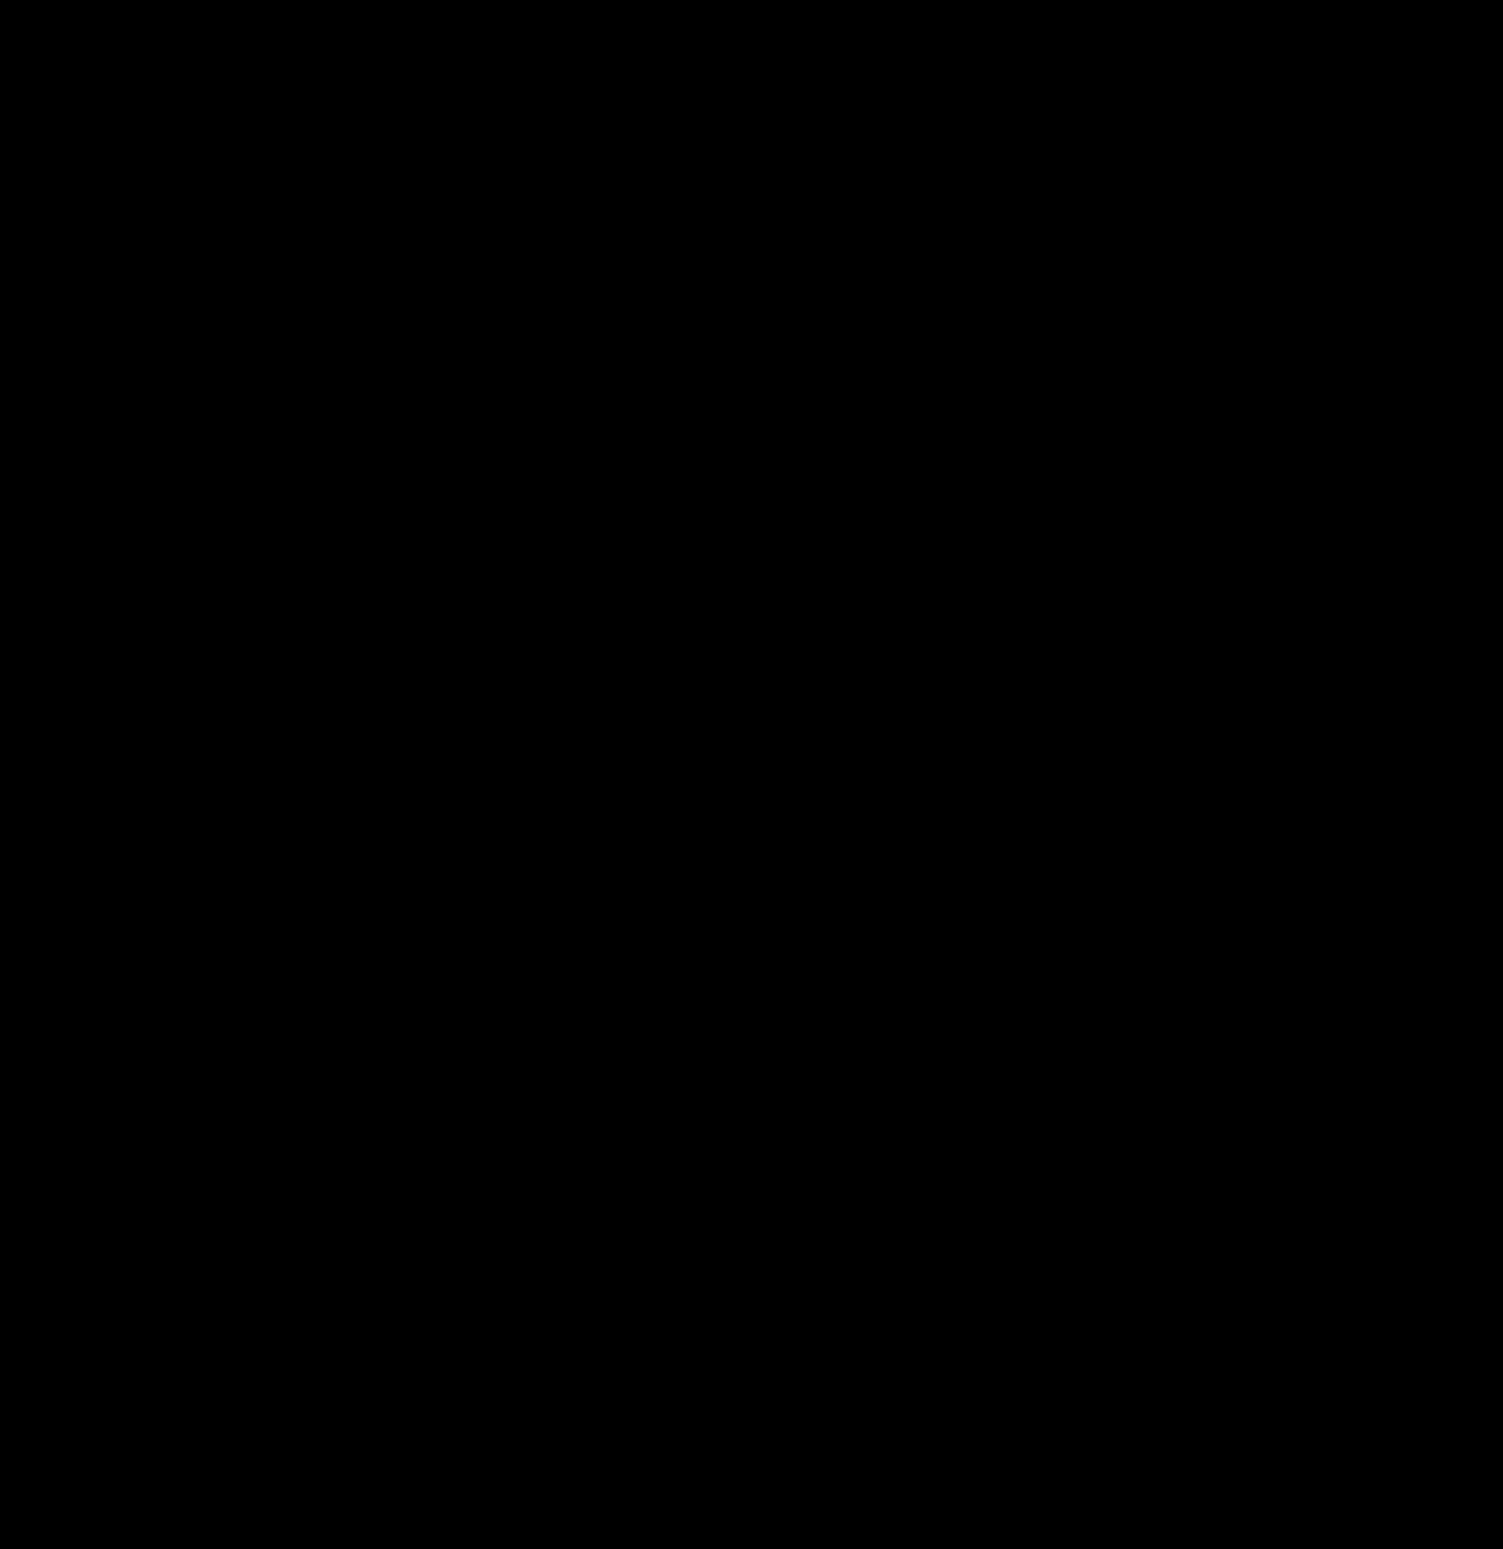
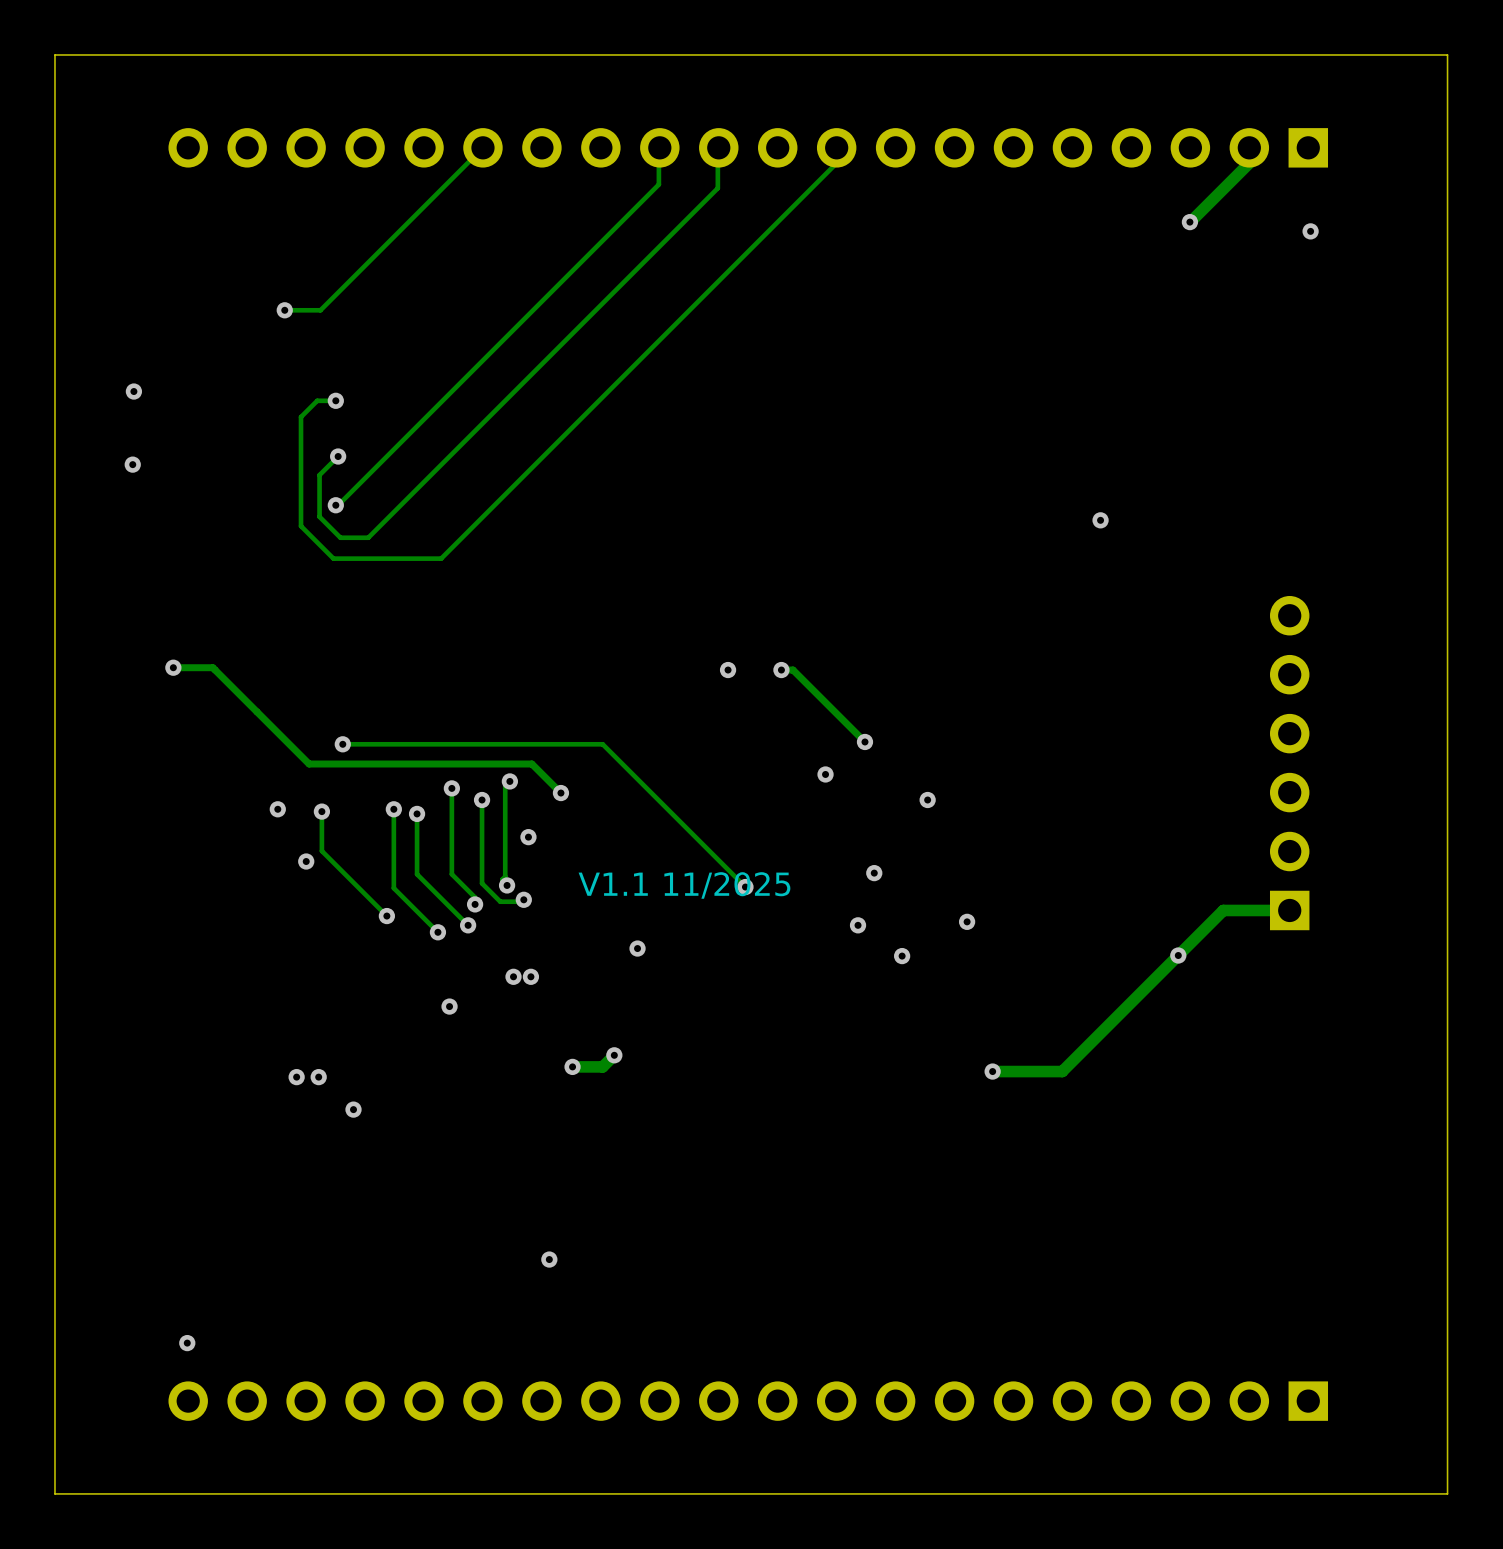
board edge: none -> (1447, 54) (54, 54) (54, 1493) (1447, 1493) (1447, 54)
track: none -> (482, 147) (320, 310) (284, 310)
track: none -> (718, 147) (717, 188) (368, 537) (340, 537) (319, 516) (319, 475) (338, 456)
part: none -> (748, 147)
track: none -> (1249, 147) (1249, 163) (1190, 222)
track: none -> (658, 164) (658, 184) (338, 505) (335, 505)
track: none -> (835, 164) (441, 558) (333, 558) (301, 526) (301, 417) (317, 400) (335, 400)
via: none -> (1189, 222)
via: none -> (1310, 231)
via: none -> (284, 310)
via: none -> (133, 391)
via: none -> (335, 400)
via: none -> (338, 456)
via: none -> (132, 464)
via: none -> (335, 505)
via: none -> (1100, 520)
track: none -> (173, 667) (212, 667) (309, 764) (531, 764) (560, 793)
via: none -> (173, 667)
via: none -> (728, 670)
track: none -> (781, 670) (793, 670) (864, 741)
via: none -> (781, 670)
via: none -> (864, 741)
track: none -> (342, 744) (602, 744) (746, 888)
via: none -> (342, 744)
part: none -> (1289, 763)
via: none -> (825, 774)
track: none -> (509, 781) (505, 786) (505, 876) (502, 879) (507, 885)
via: none -> (509, 781)
track: none -> (451, 788) (451, 874) (475, 897) (475, 904)
via: none -> (451, 788)
via: none -> (560, 793)
track: none -> (482, 800) (482, 883) (500, 901) (521, 901) (523, 899)
via: none -> (482, 800)
via: none -> (927, 800)
via: none -> (277, 809)
track: none -> (393, 809) (393, 888) (437, 932)
via: none -> (393, 809)
track: none -> (321, 811) (321, 851) (386, 916)
via: none -> (321, 811)
track: none -> (417, 813) (417, 874) (468, 925)
via: none -> (417, 813)
via: none -> (528, 837)
via: none -> (306, 861)
via: none -> (874, 873)
via: none -> (507, 885)
text: none -> V1.1 11/2025 (684, 885)
via: none -> (745, 887)
via: none -> (523, 899)
via: none -> (475, 904)
track: none -> (1289, 910) (1223, 910) (1062, 1071) (992, 1071)
via: none -> (386, 916)
via: none -> (967, 921)
via: none -> (468, 925)
via: none -> (858, 925)
via: none -> (437, 932)
via: none -> (637, 948)
via: none -> (1178, 955)
via: none -> (902, 956)
via: none -> (513, 976)
via: none -> (530, 976)
via: none -> (449, 1006)
track: none -> (614, 1055) (602, 1066) (572, 1066)
via: none -> (614, 1055)
via: none -> (572, 1066)
via: none -> (992, 1071)
via: none -> (296, 1077)
via: none -> (318, 1077)
via: none -> (353, 1109)
via: none -> (549, 1259)
via: none -> (187, 1343)
part: none -> (748, 1401)

